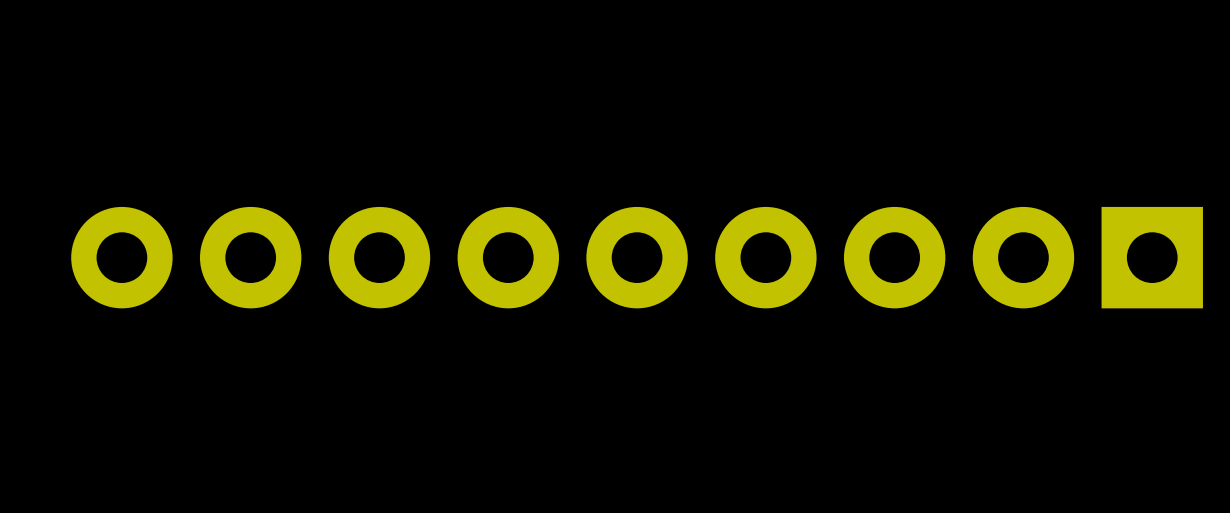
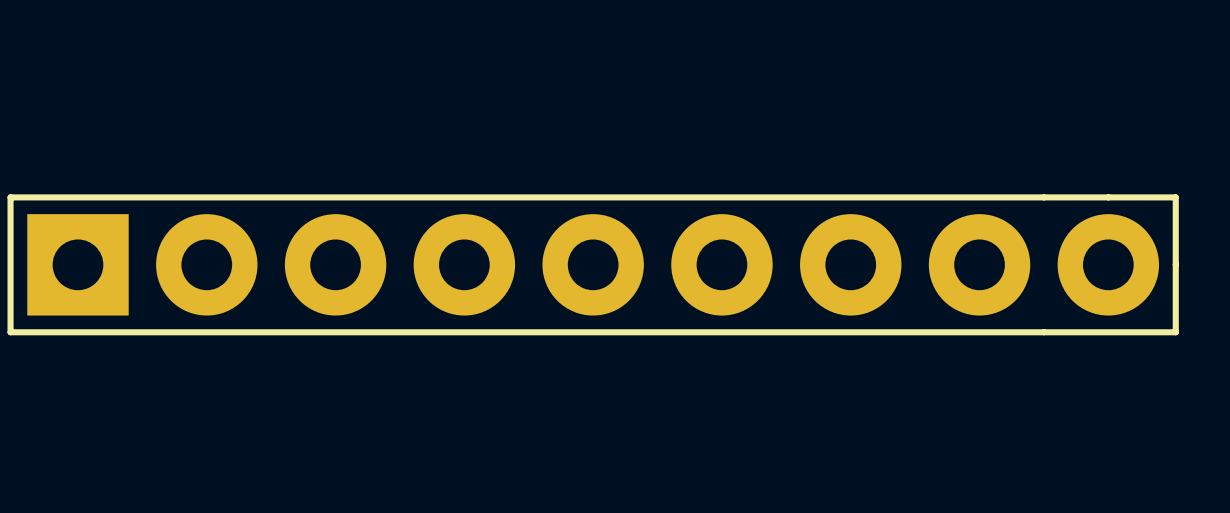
part side: bottom (637, 257) -> top (593, 264)

